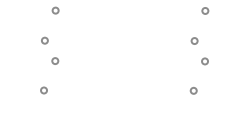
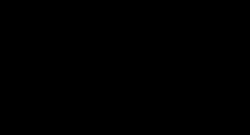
via: (55, 10) -> none
via: (205, 10) -> none
via: (44, 40) -> none
via: (194, 41) -> none
via: (55, 61) -> none
via: (205, 61) -> none
via: (44, 90) -> none
via: (193, 90) -> none

